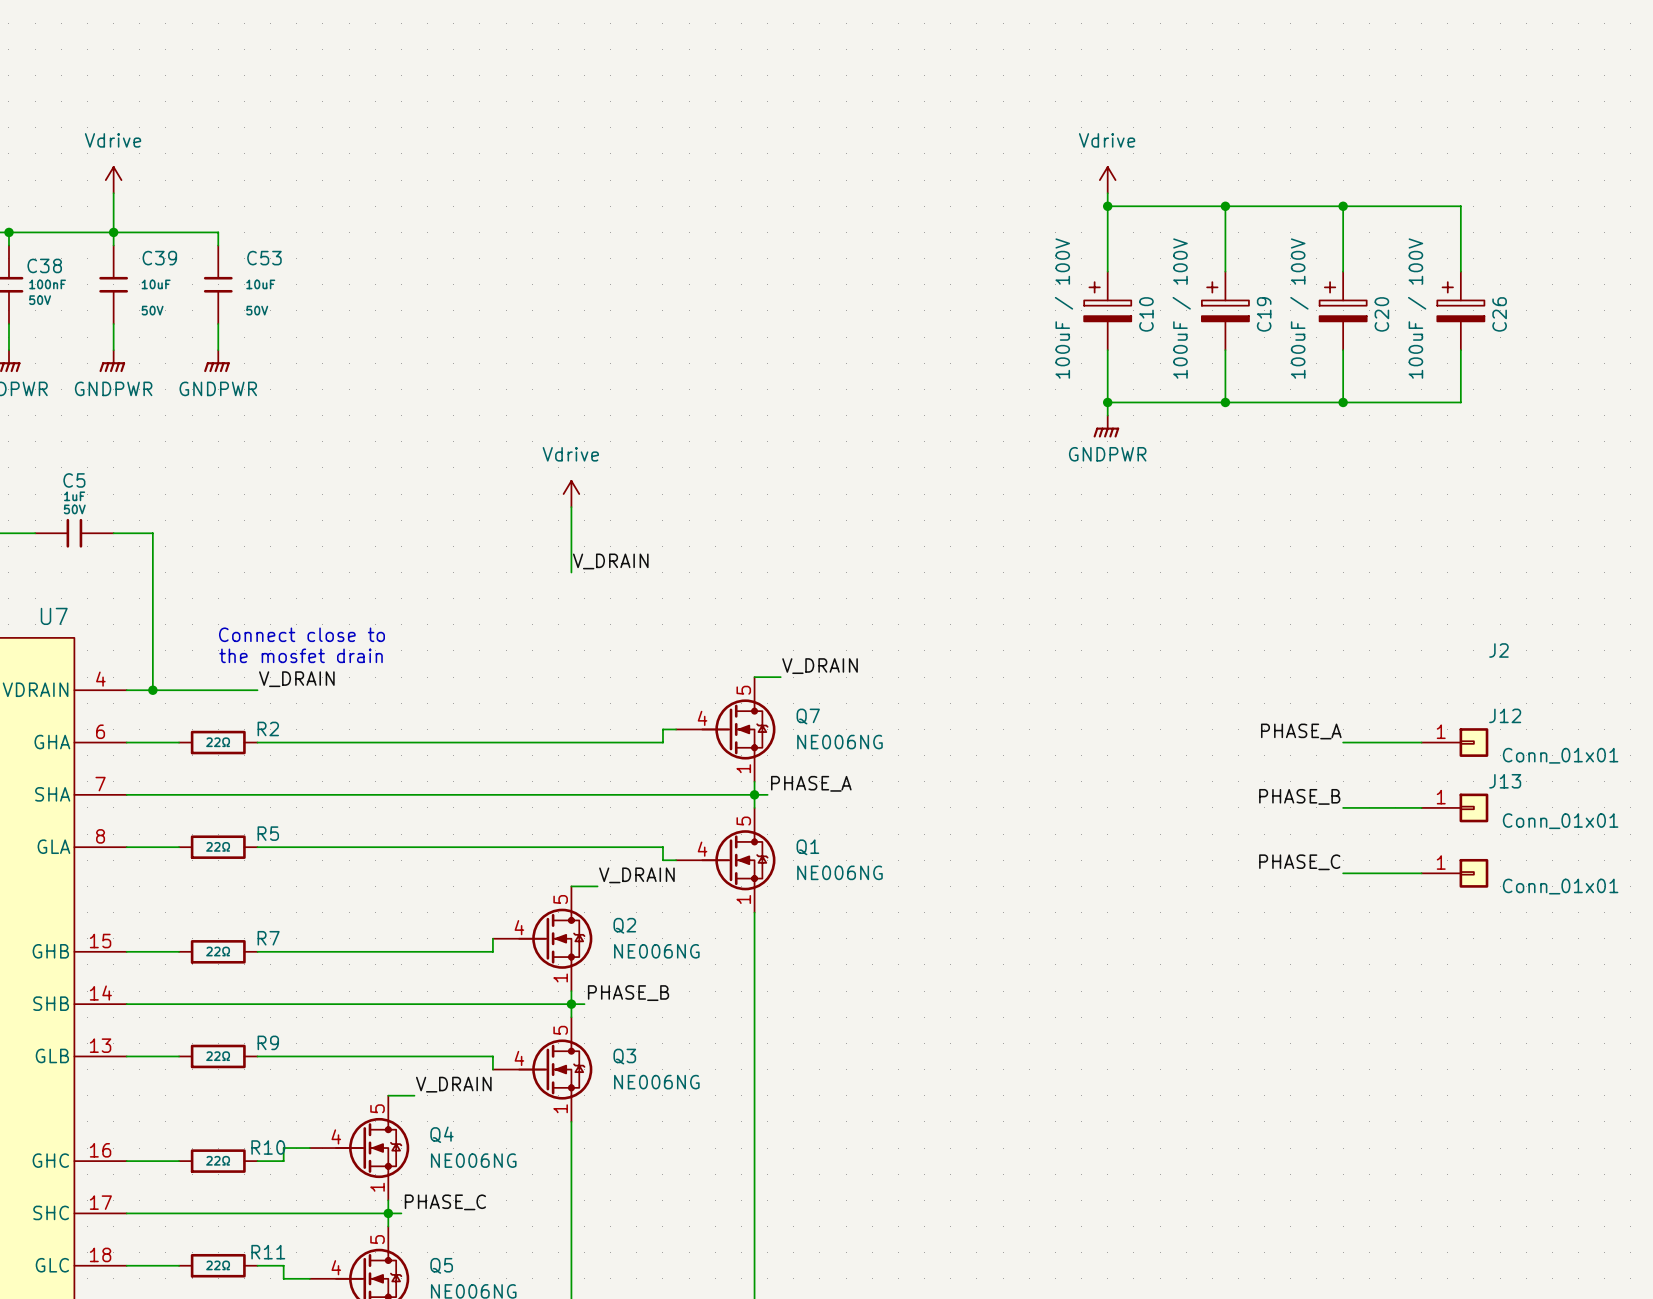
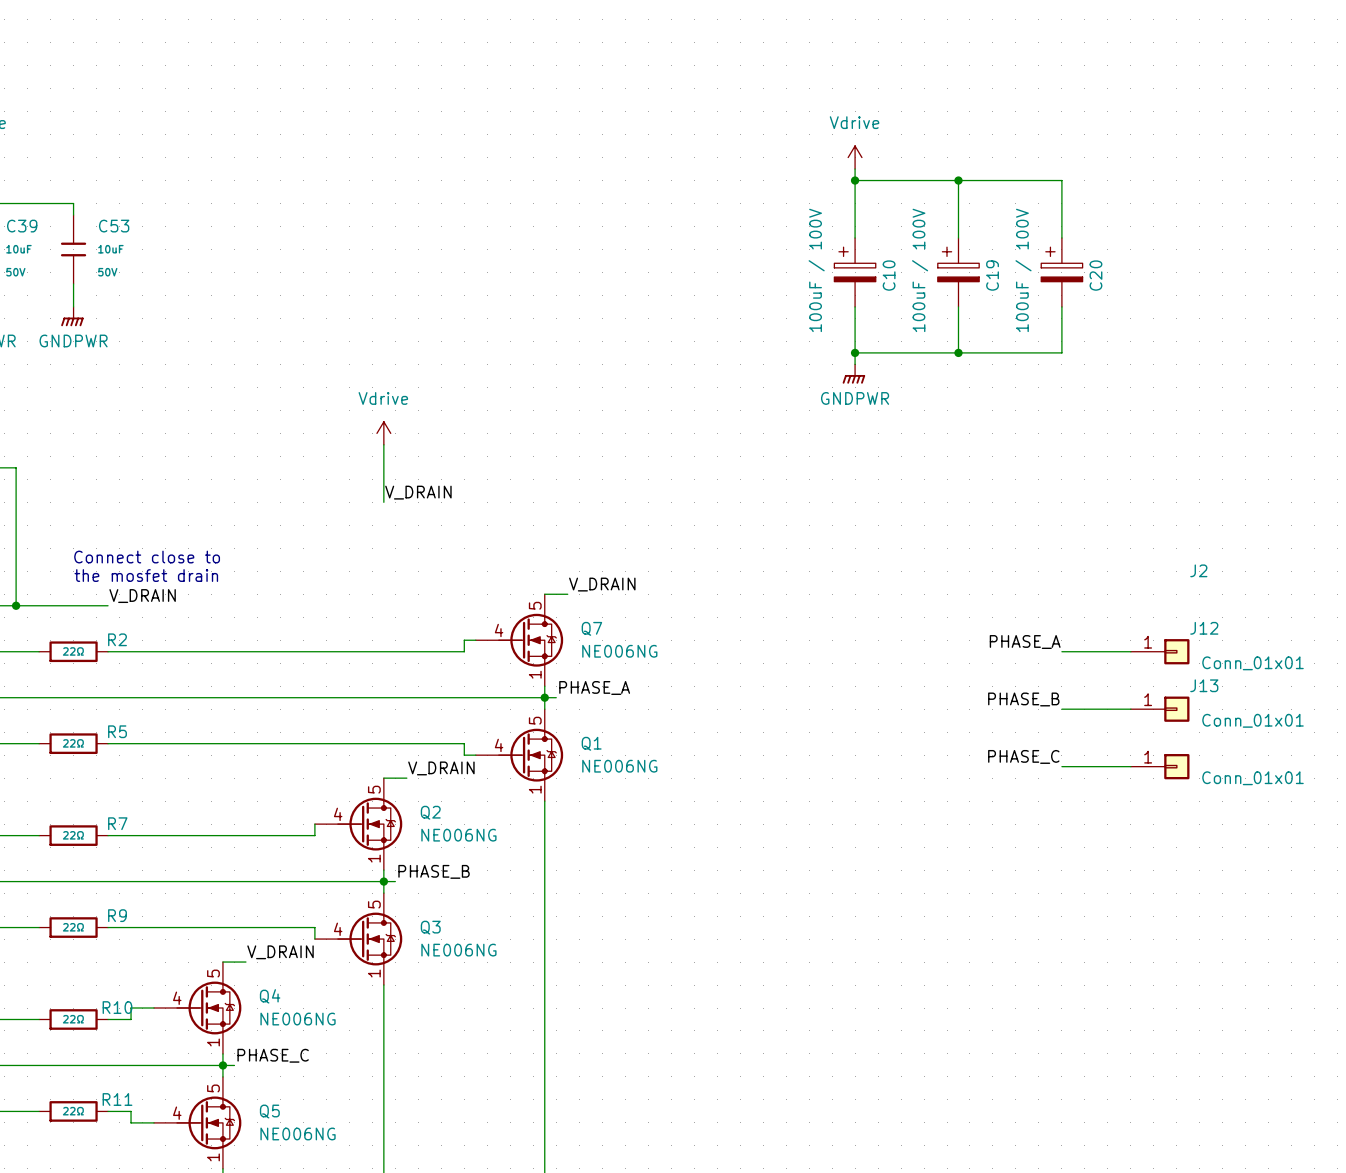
wire: (1343, 206) (1460, 206) (1460, 271) -> none
junction: (1343, 206) -> none
C26: 100uF / 100V (1460, 310) -> none
wire: (1460, 350) (1460, 402) (1343, 402) -> none
junction: (1343, 402) -> none

